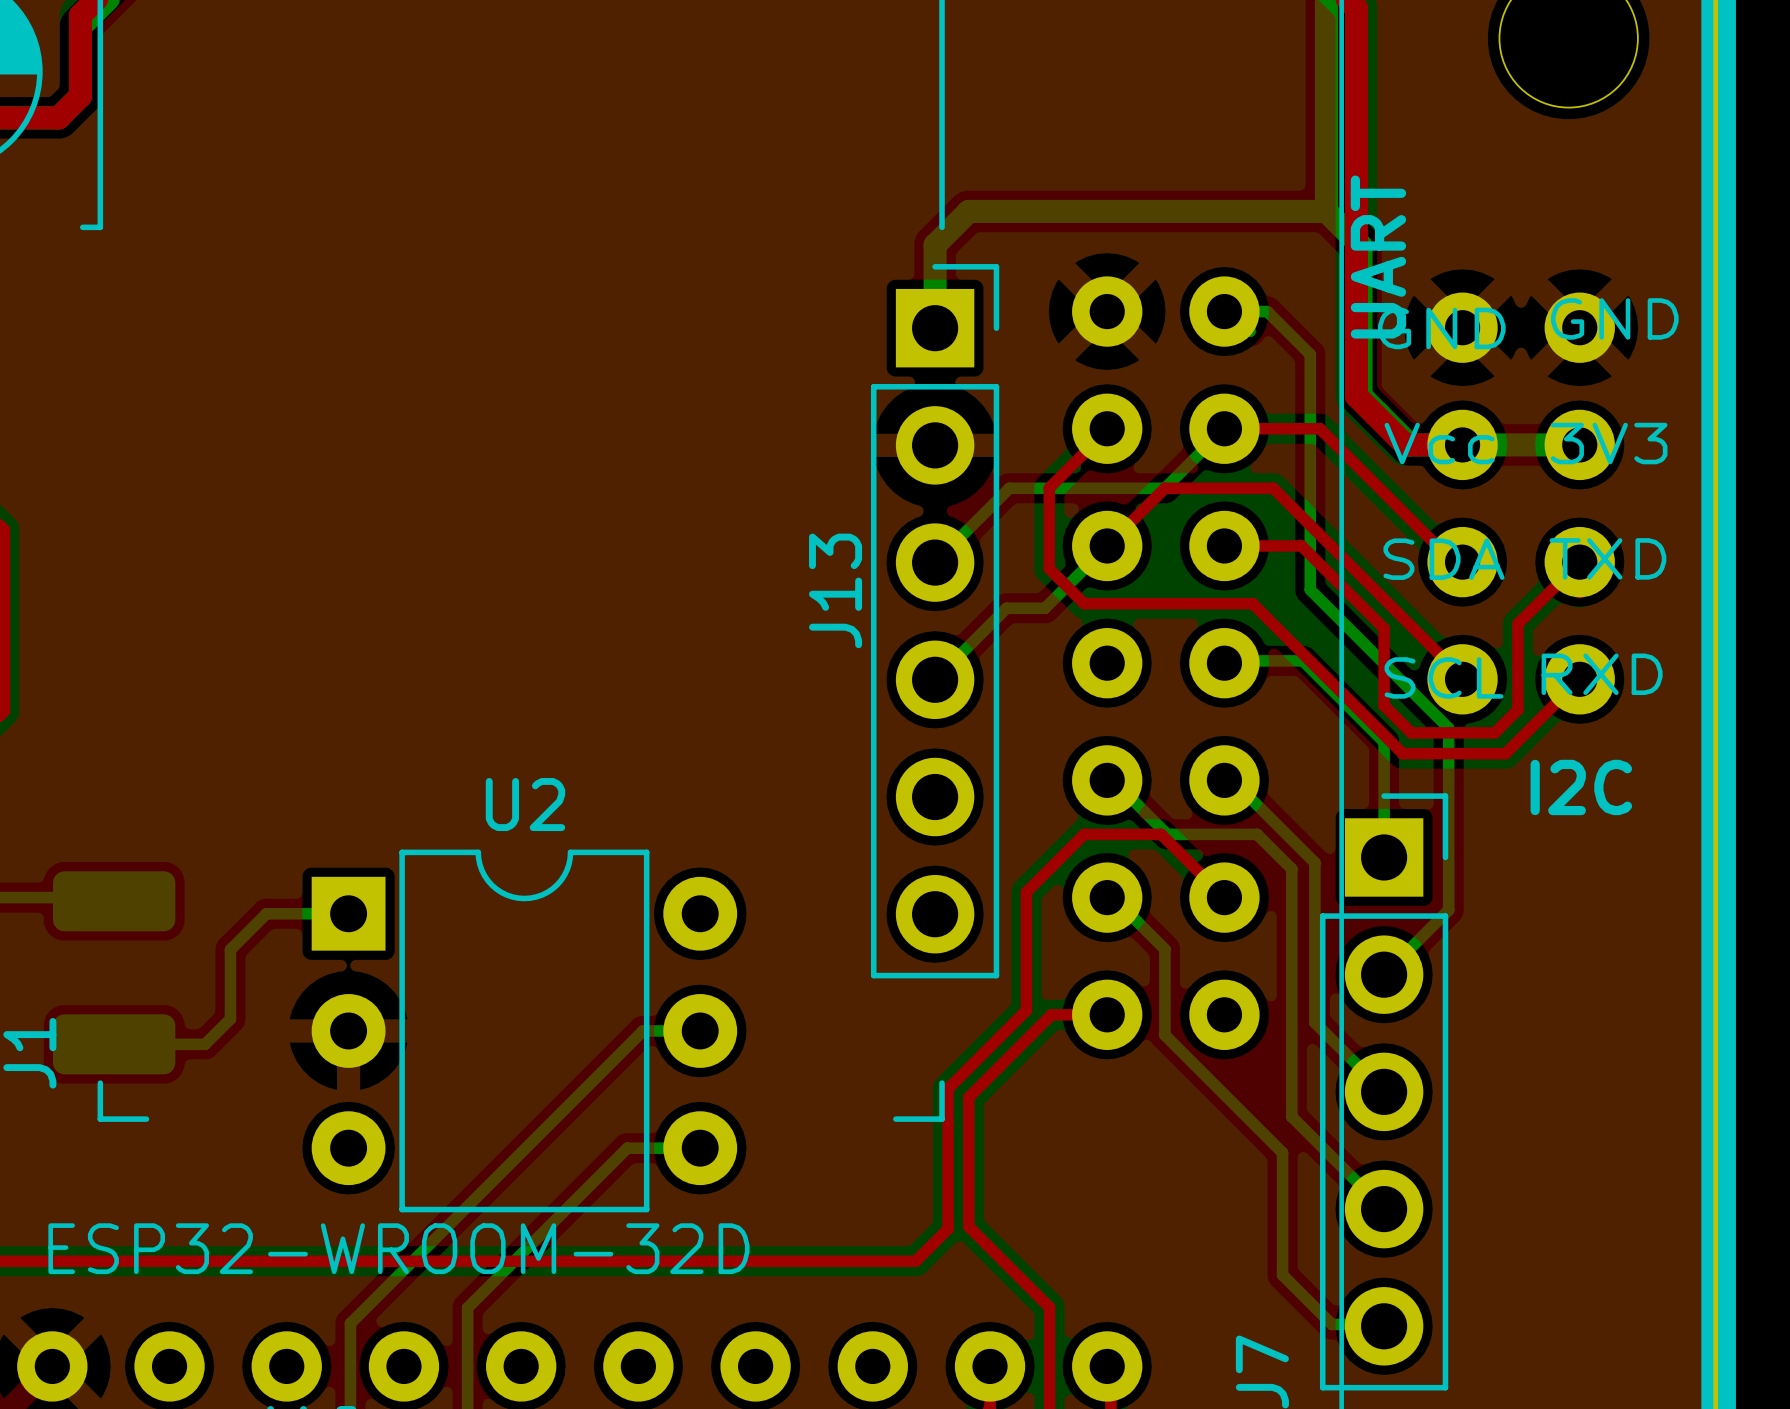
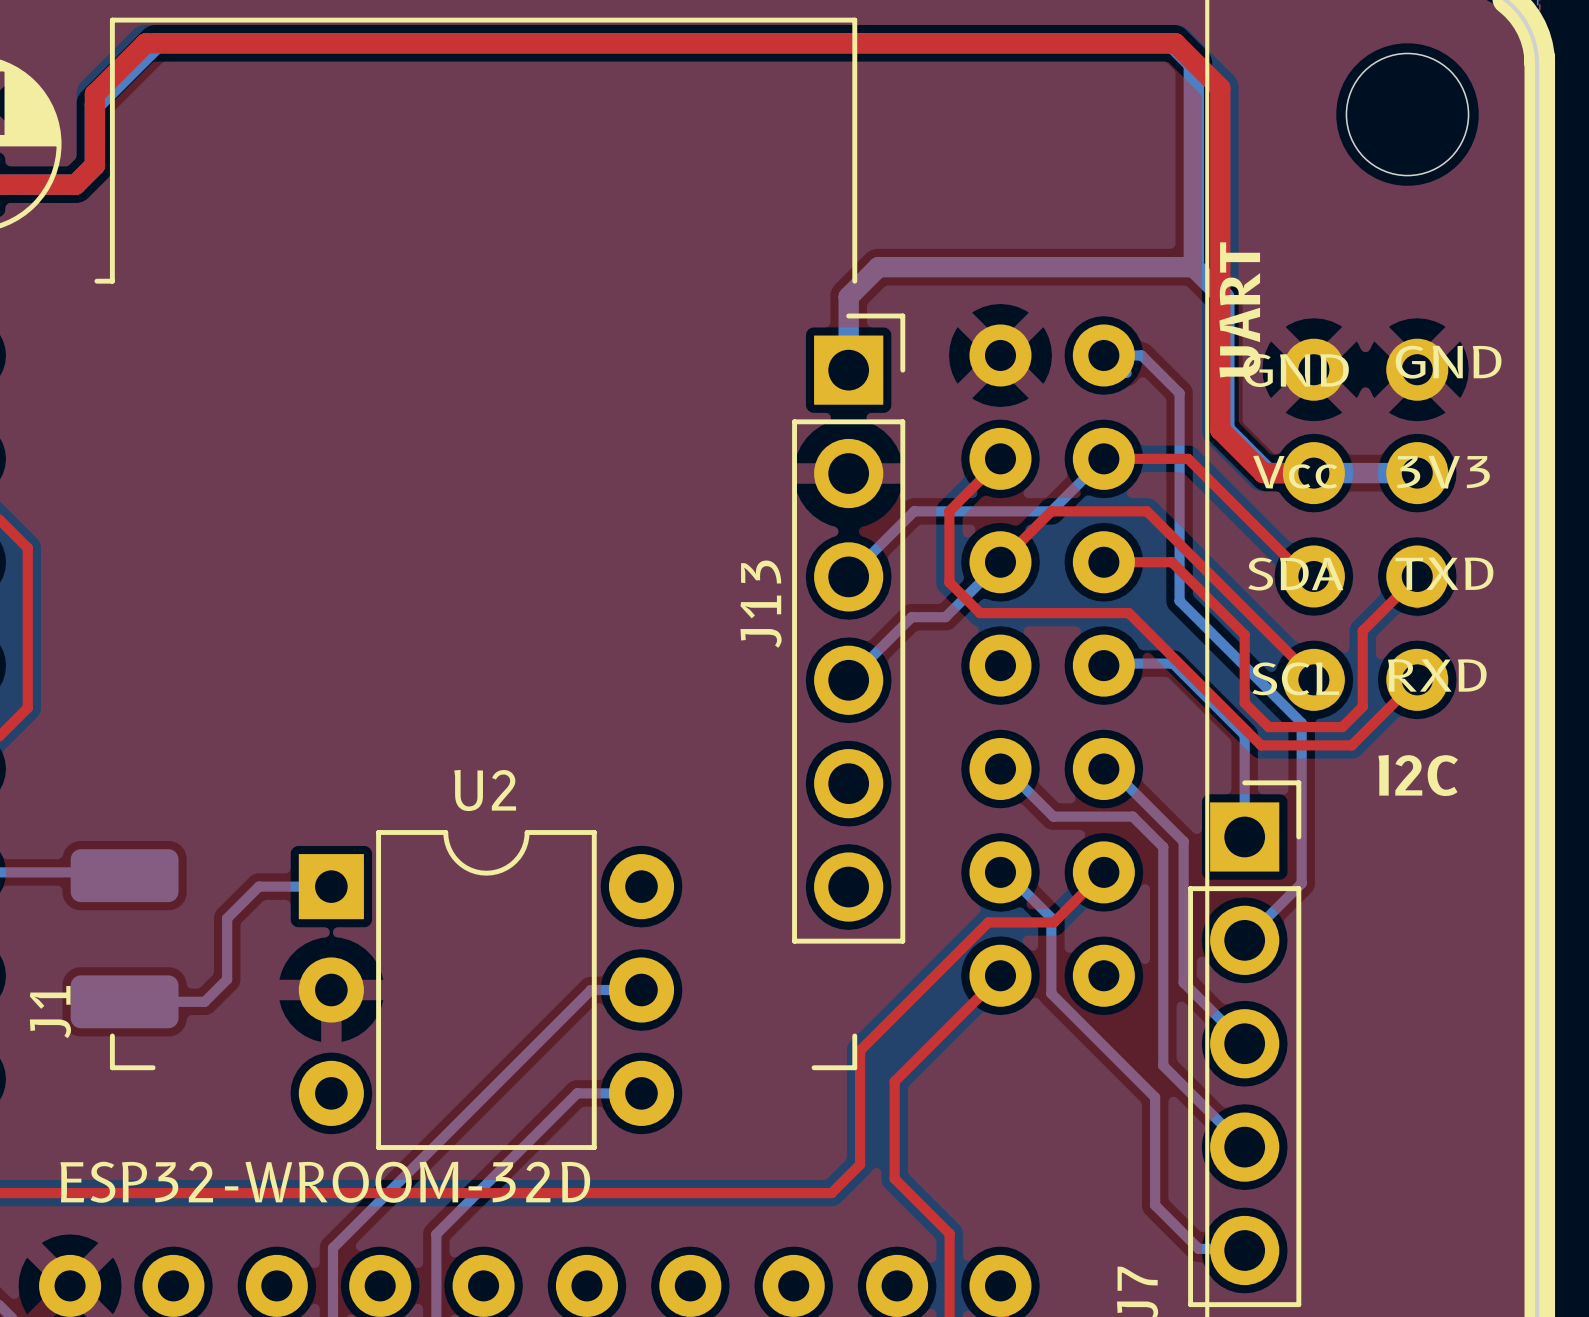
top track: (1224, 897) (1161, 834) (1084, 834) (1026, 892) (1026, 1010) (948, 1088) (948, 1099) -> (1103, 872) (1053, 922) (988, 922) (860, 1050)
top track: (1107, 1014) (1051, 1014) (968, 1097) (968, 1226) (987, 1245) -> (1000, 975) (894, 1081) (894, 1178)

